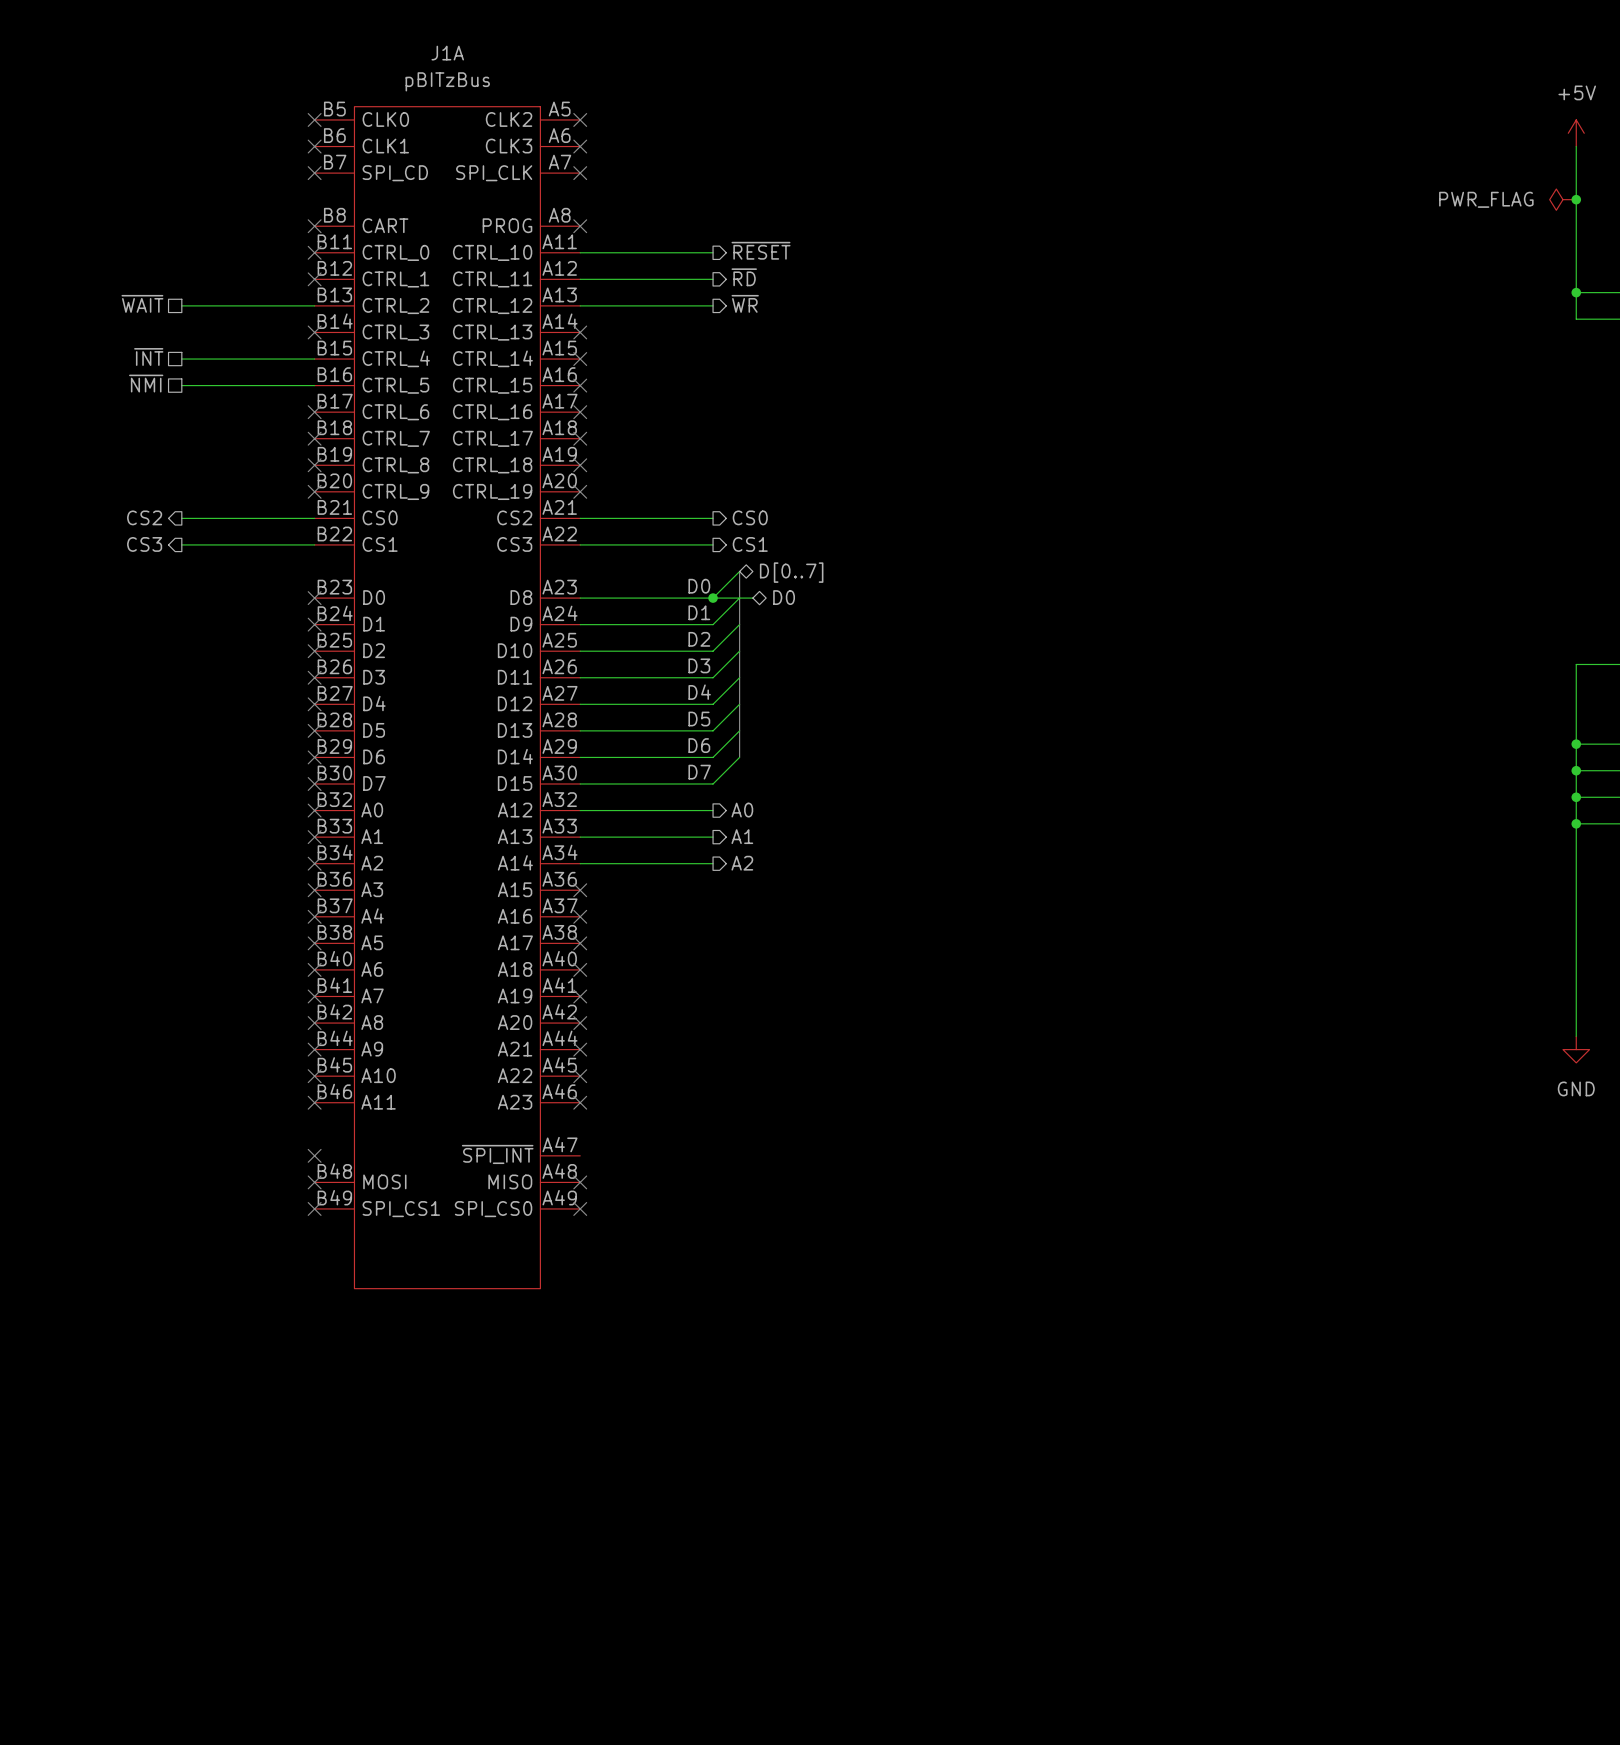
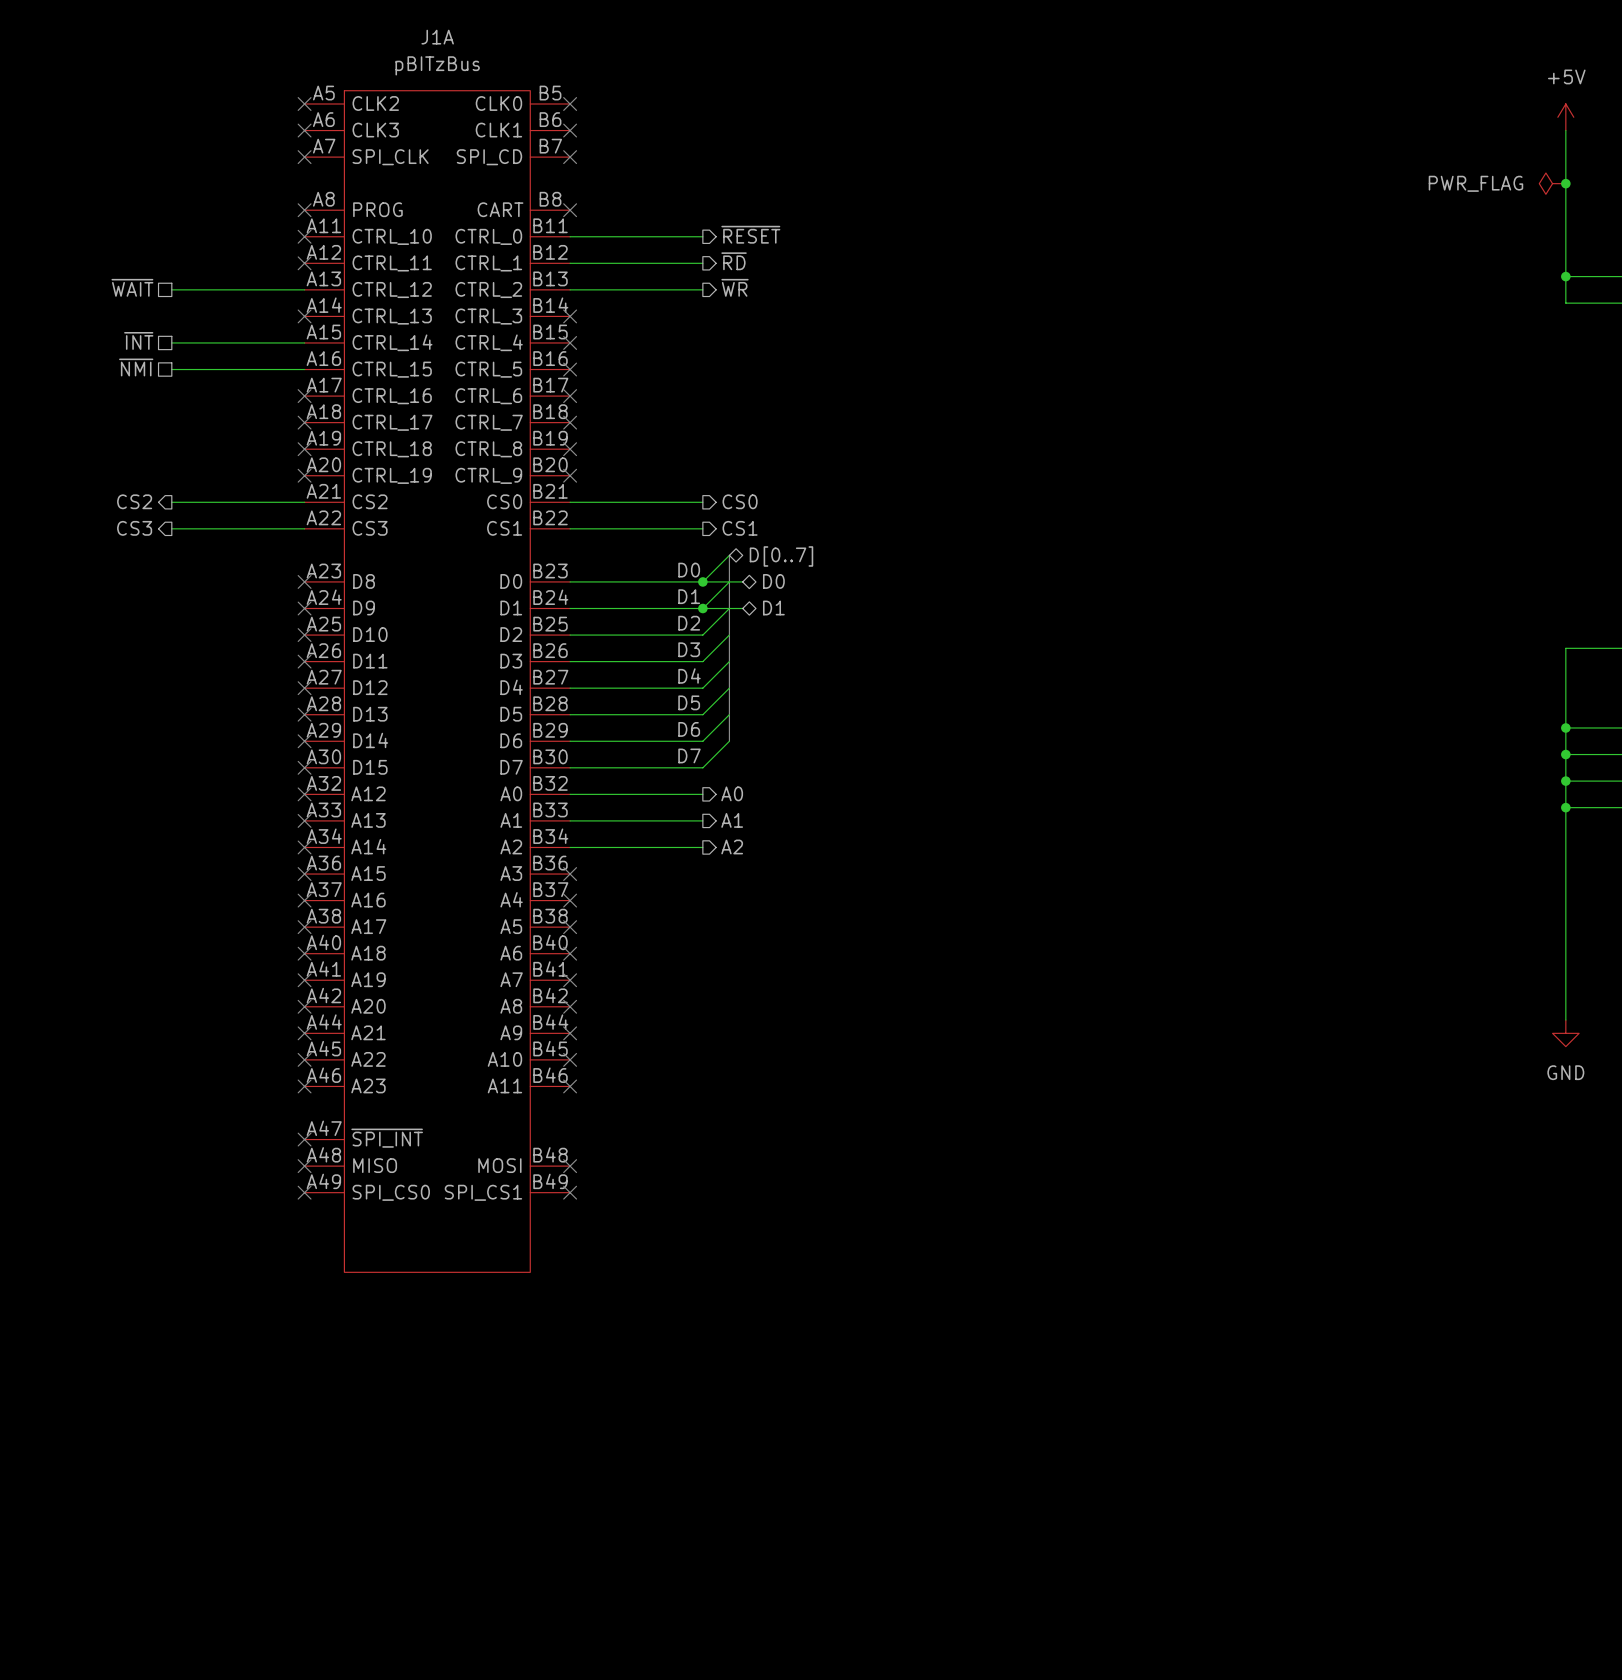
wire: none -> (702, 608) (742, 608)
junction: none -> (702, 608)
hierarchical label: none -> D1 (773, 608)
J1A flip: as is (447, 697) -> left-right (437, 681)

